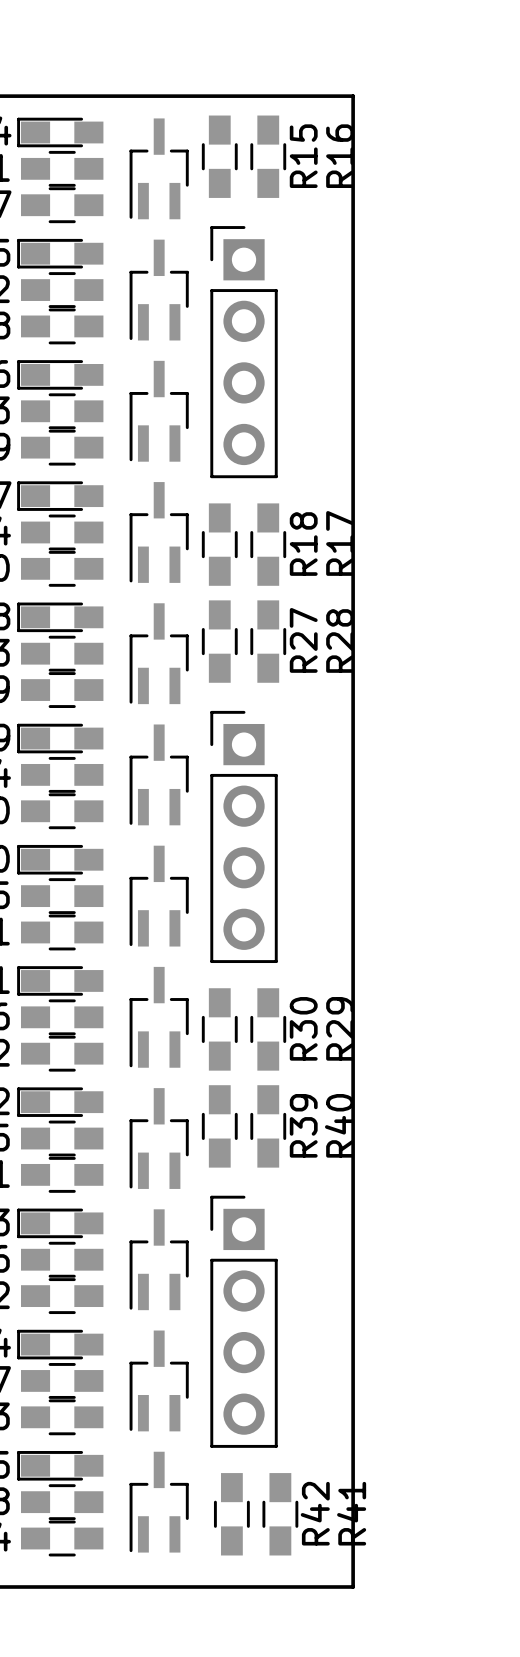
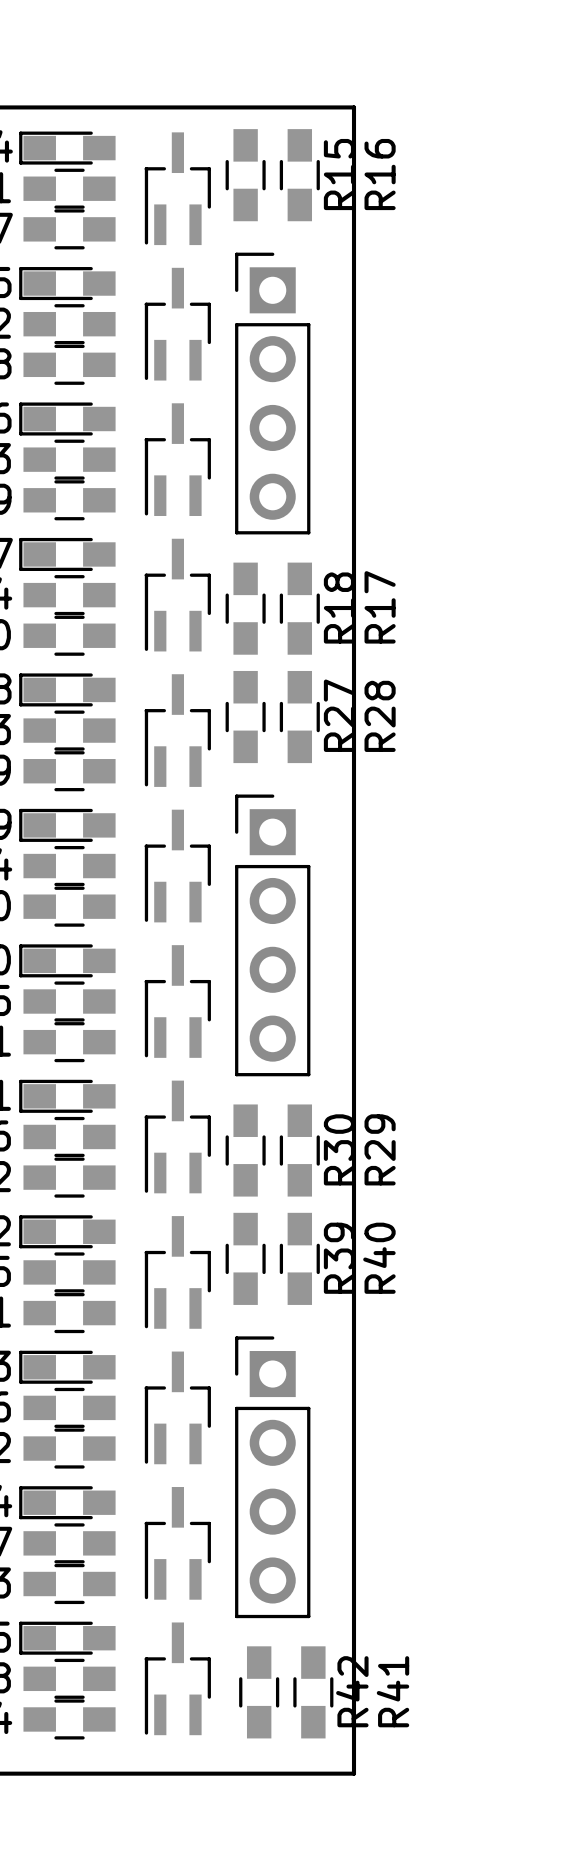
board edge: (316, 96) (353, 96) (353, 1587) (316, 1587) -> (354, 107) (354, 1773)

